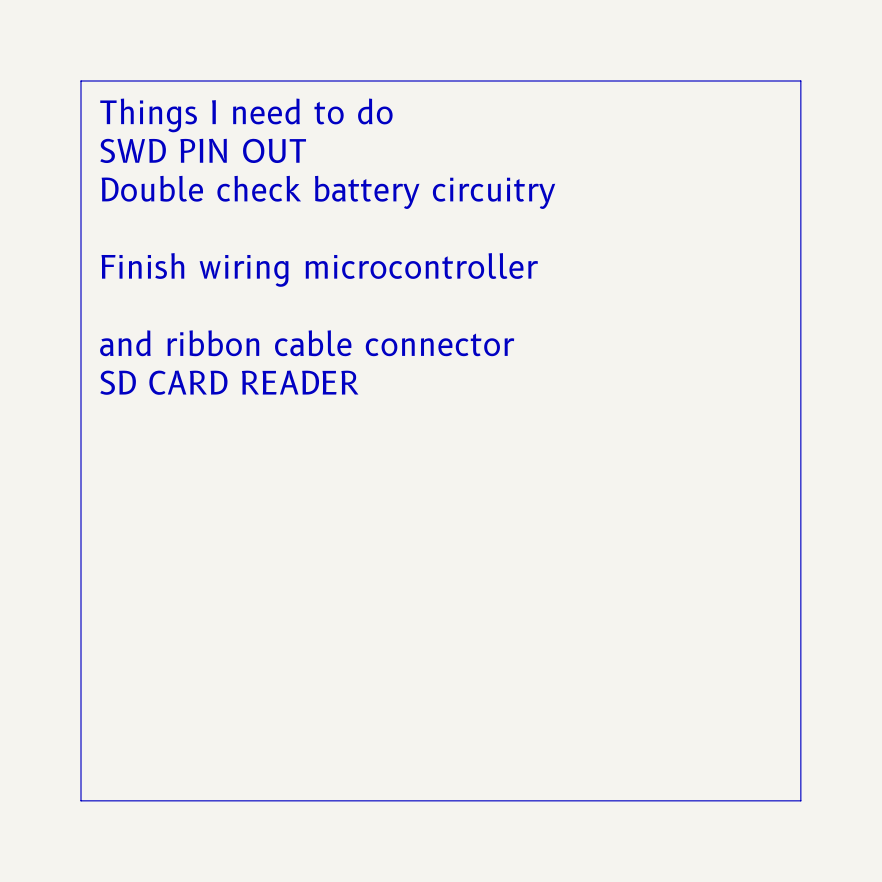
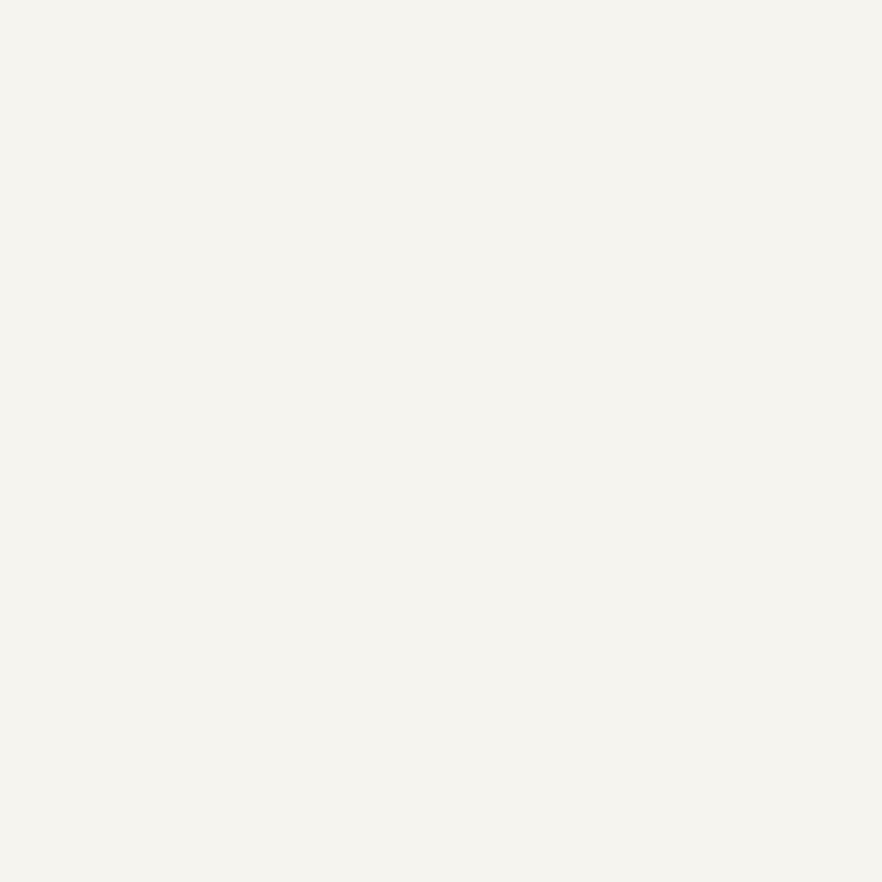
line: (81, 81) (800, 81) (800, 800) (81, 800) (81, 81) -> none
text: Things I need to do (246, 115) -> none
text: SWD PIN OUT (203, 150) -> none
text: Double check battery circuitry (328, 192) -> none
text: Finish wiring microcontroller (319, 269) -> none
text: and ribbon cable connector (307, 343) -> none
text: SD CARD READER (229, 382) -> none

